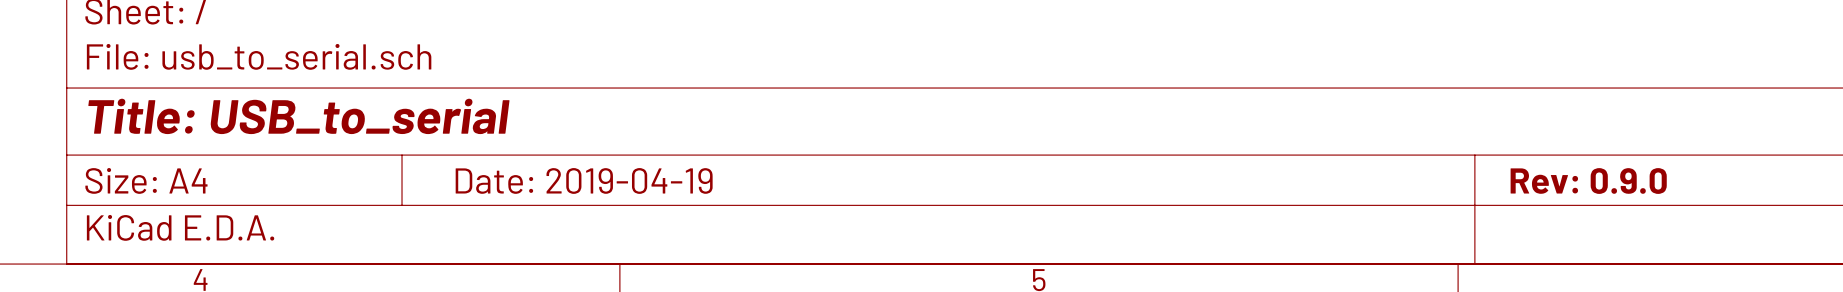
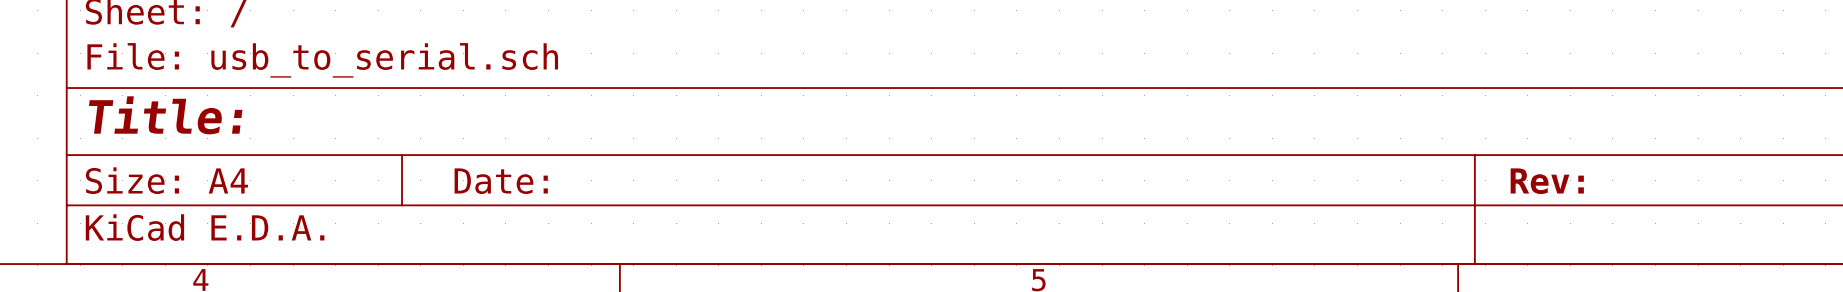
title block: Title: USB_to_serial (298, 116) -> Title: (165, 115)
title block: Date: 2019-04-19 (584, 180) -> Date: (501, 181)
title block: Rev: 0.9.0 (1588, 181) -> Rev: (1547, 181)

